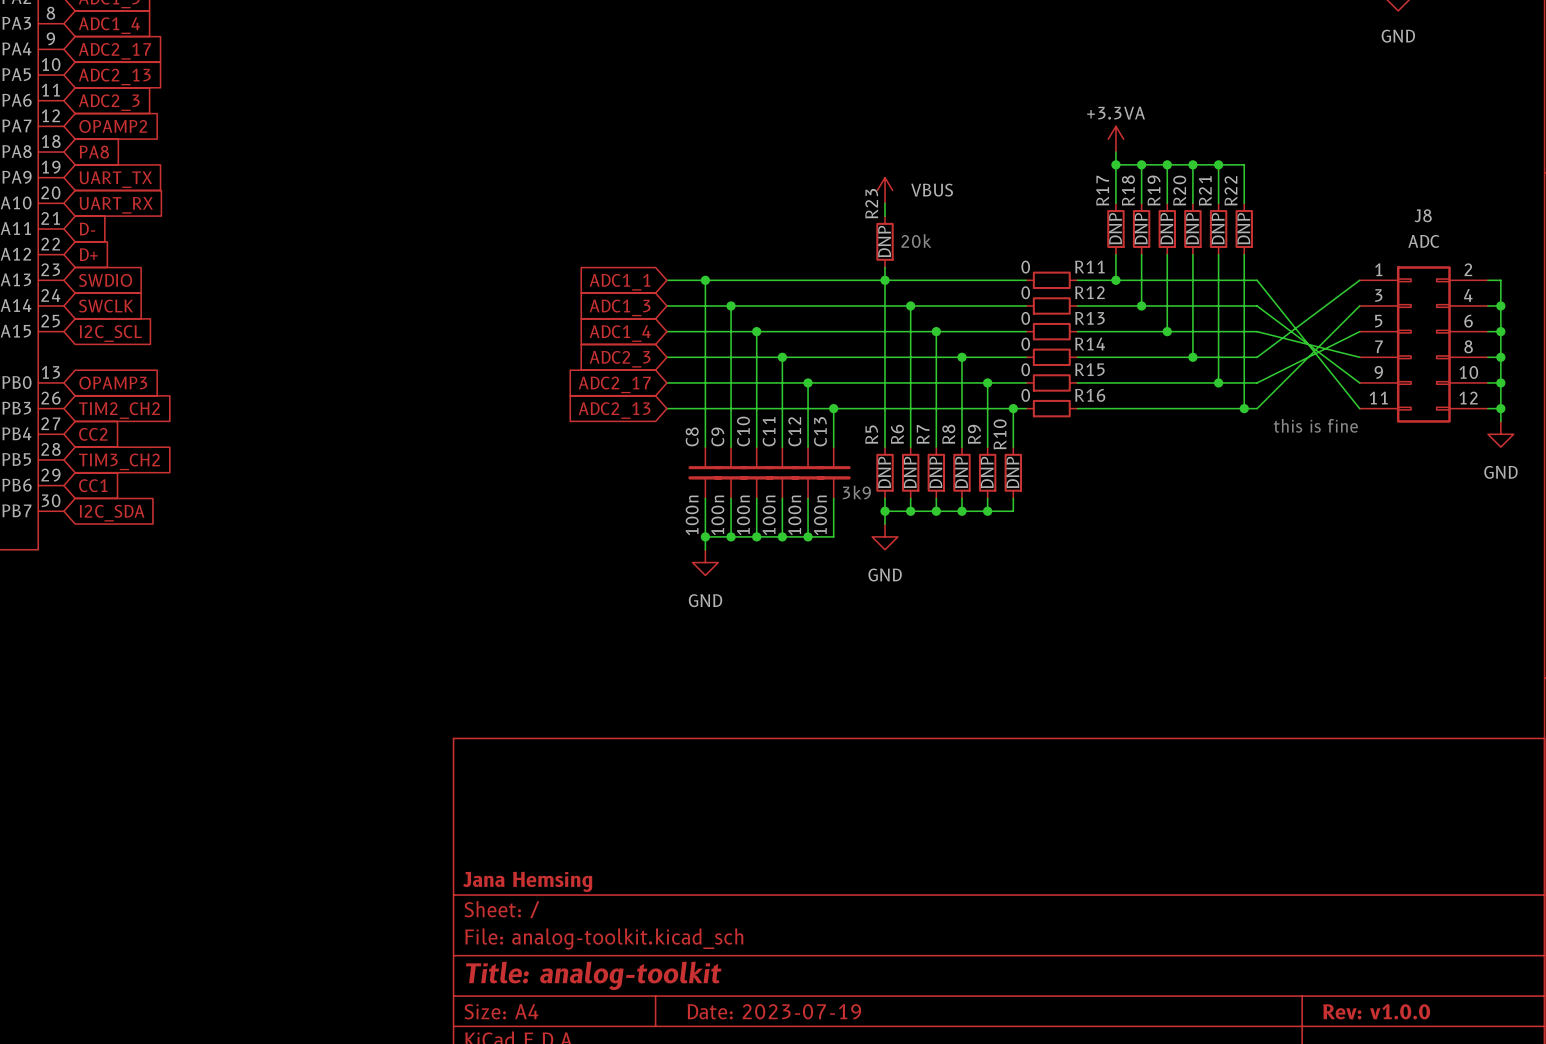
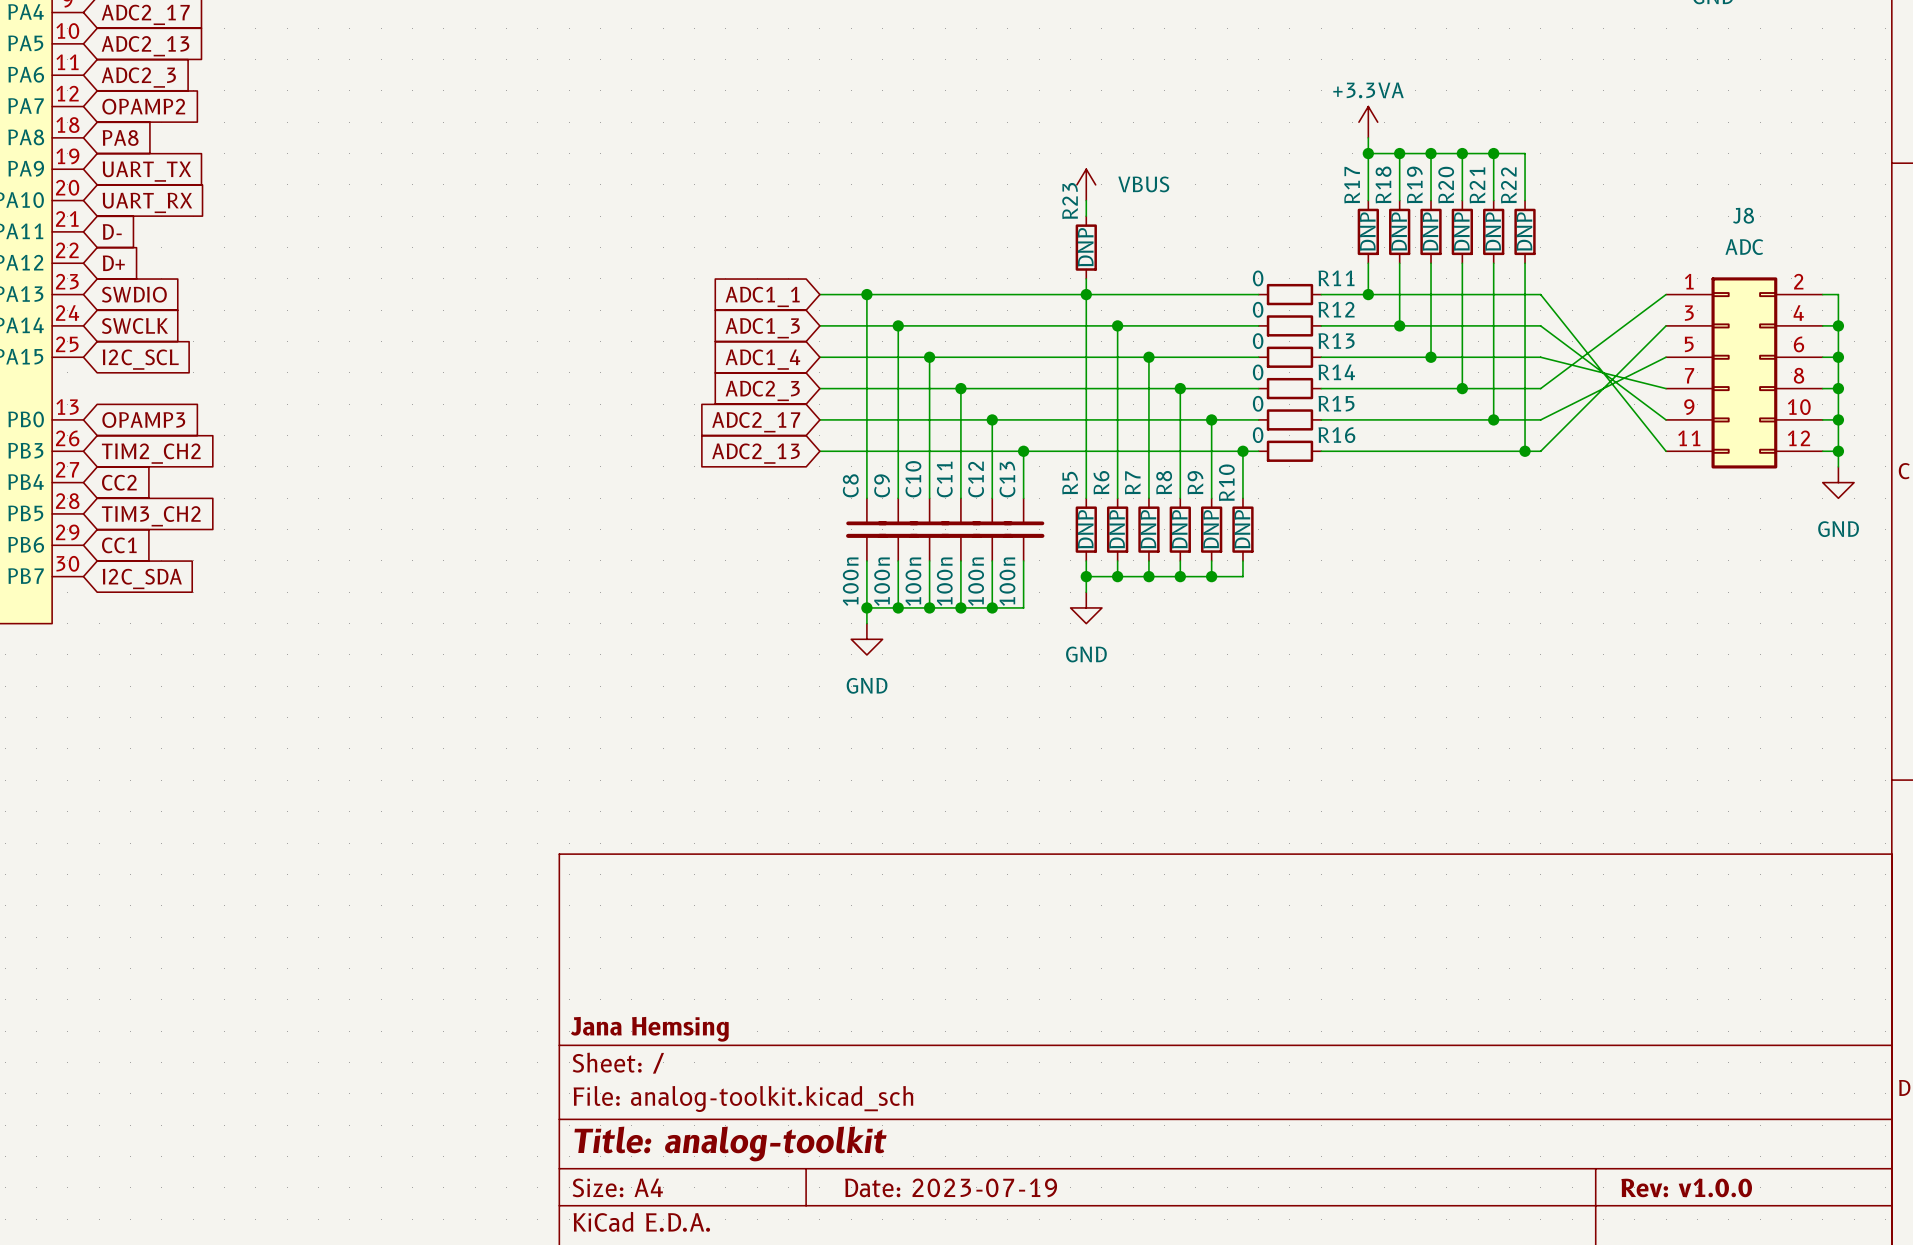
text: 20k (916, 241) -> none
text: this is fine (1315, 425) -> none
text: 3k9 (856, 492) -> none

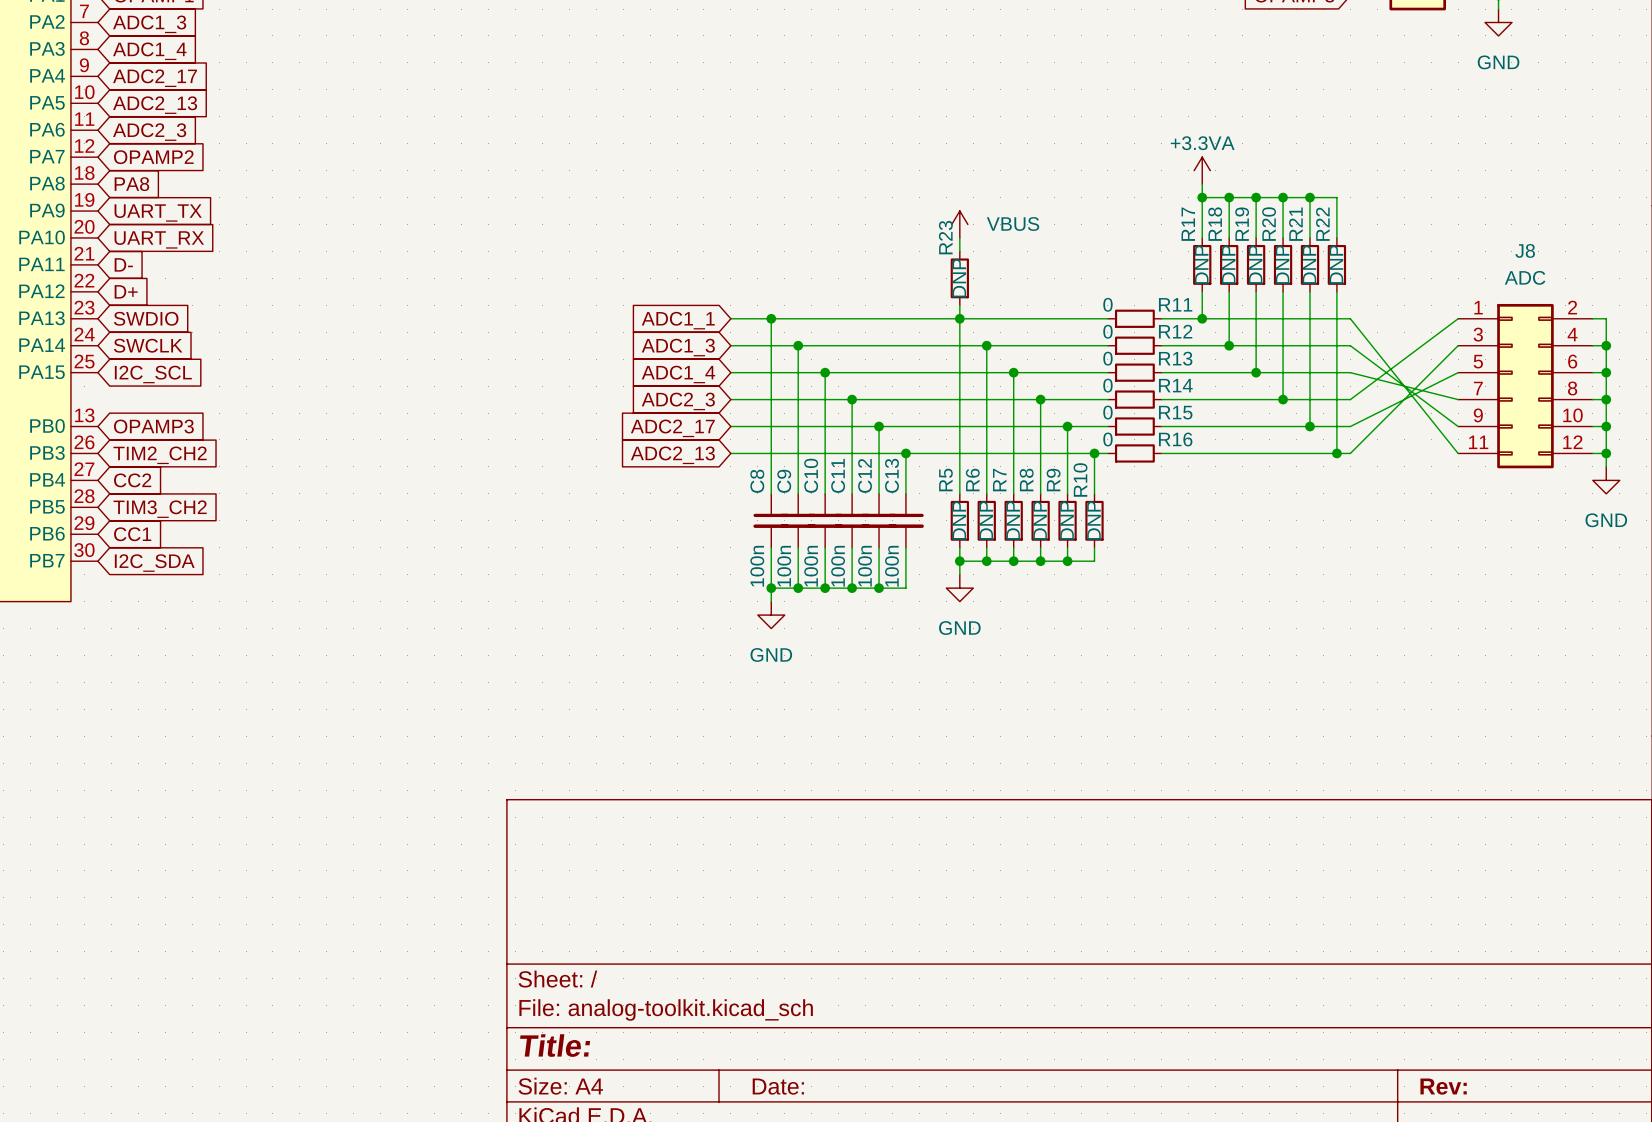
title block: Jana Hemsing (649, 1029) -> none
title block: Title: analog-toolkit (730, 1143) -> Title: (555, 1045)
title block: Date: 2023-07-19 (951, 1187) -> Date: (778, 1086)
title block: Rev: v1.0.0 (1686, 1187) -> Rev: (1443, 1086)

